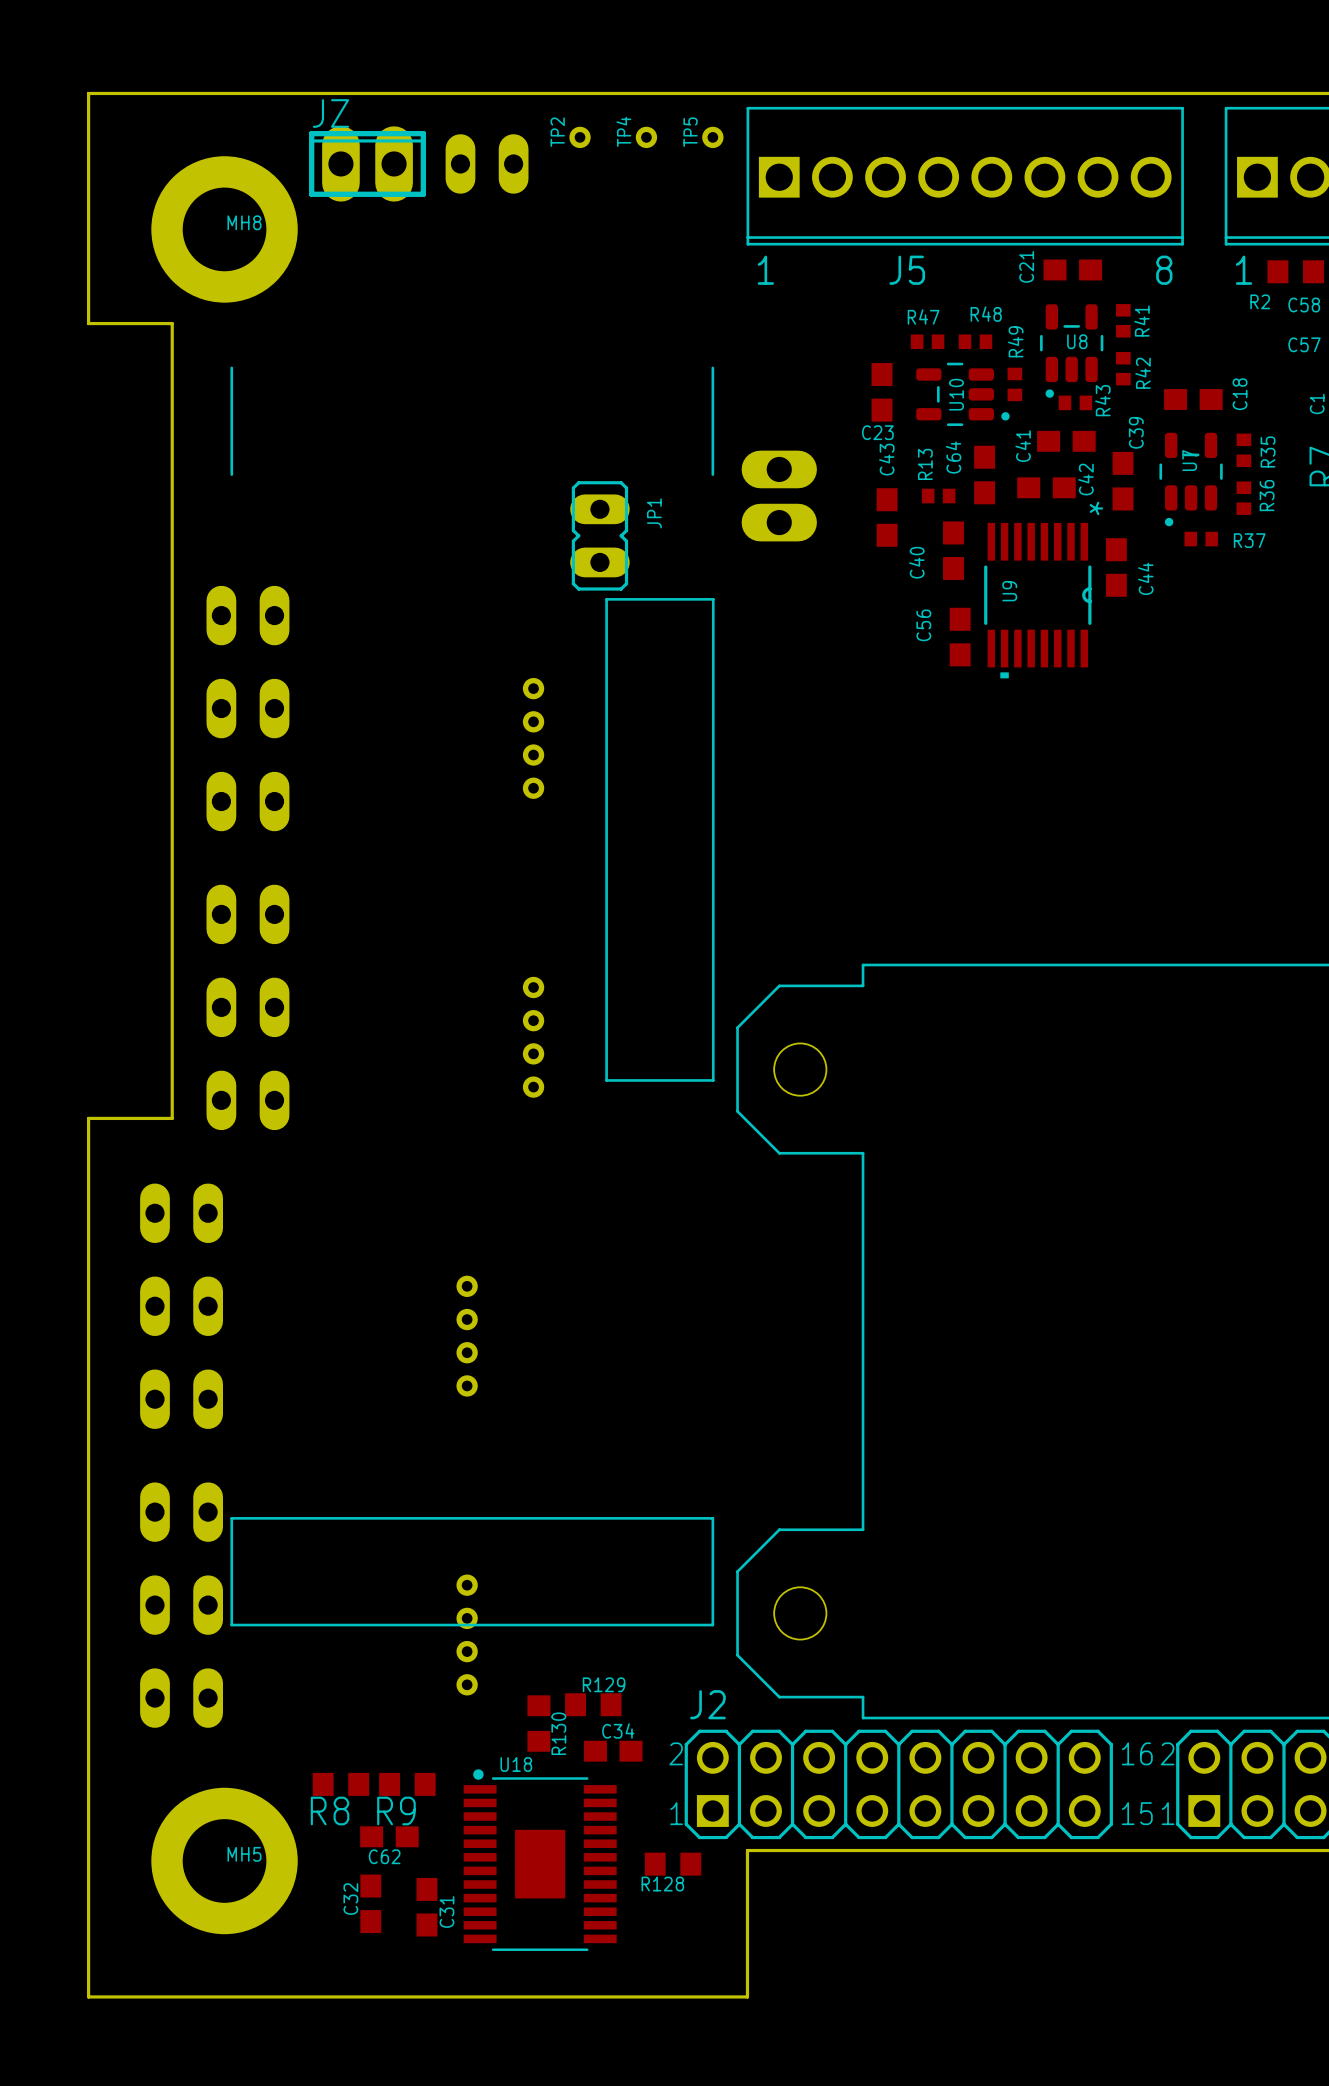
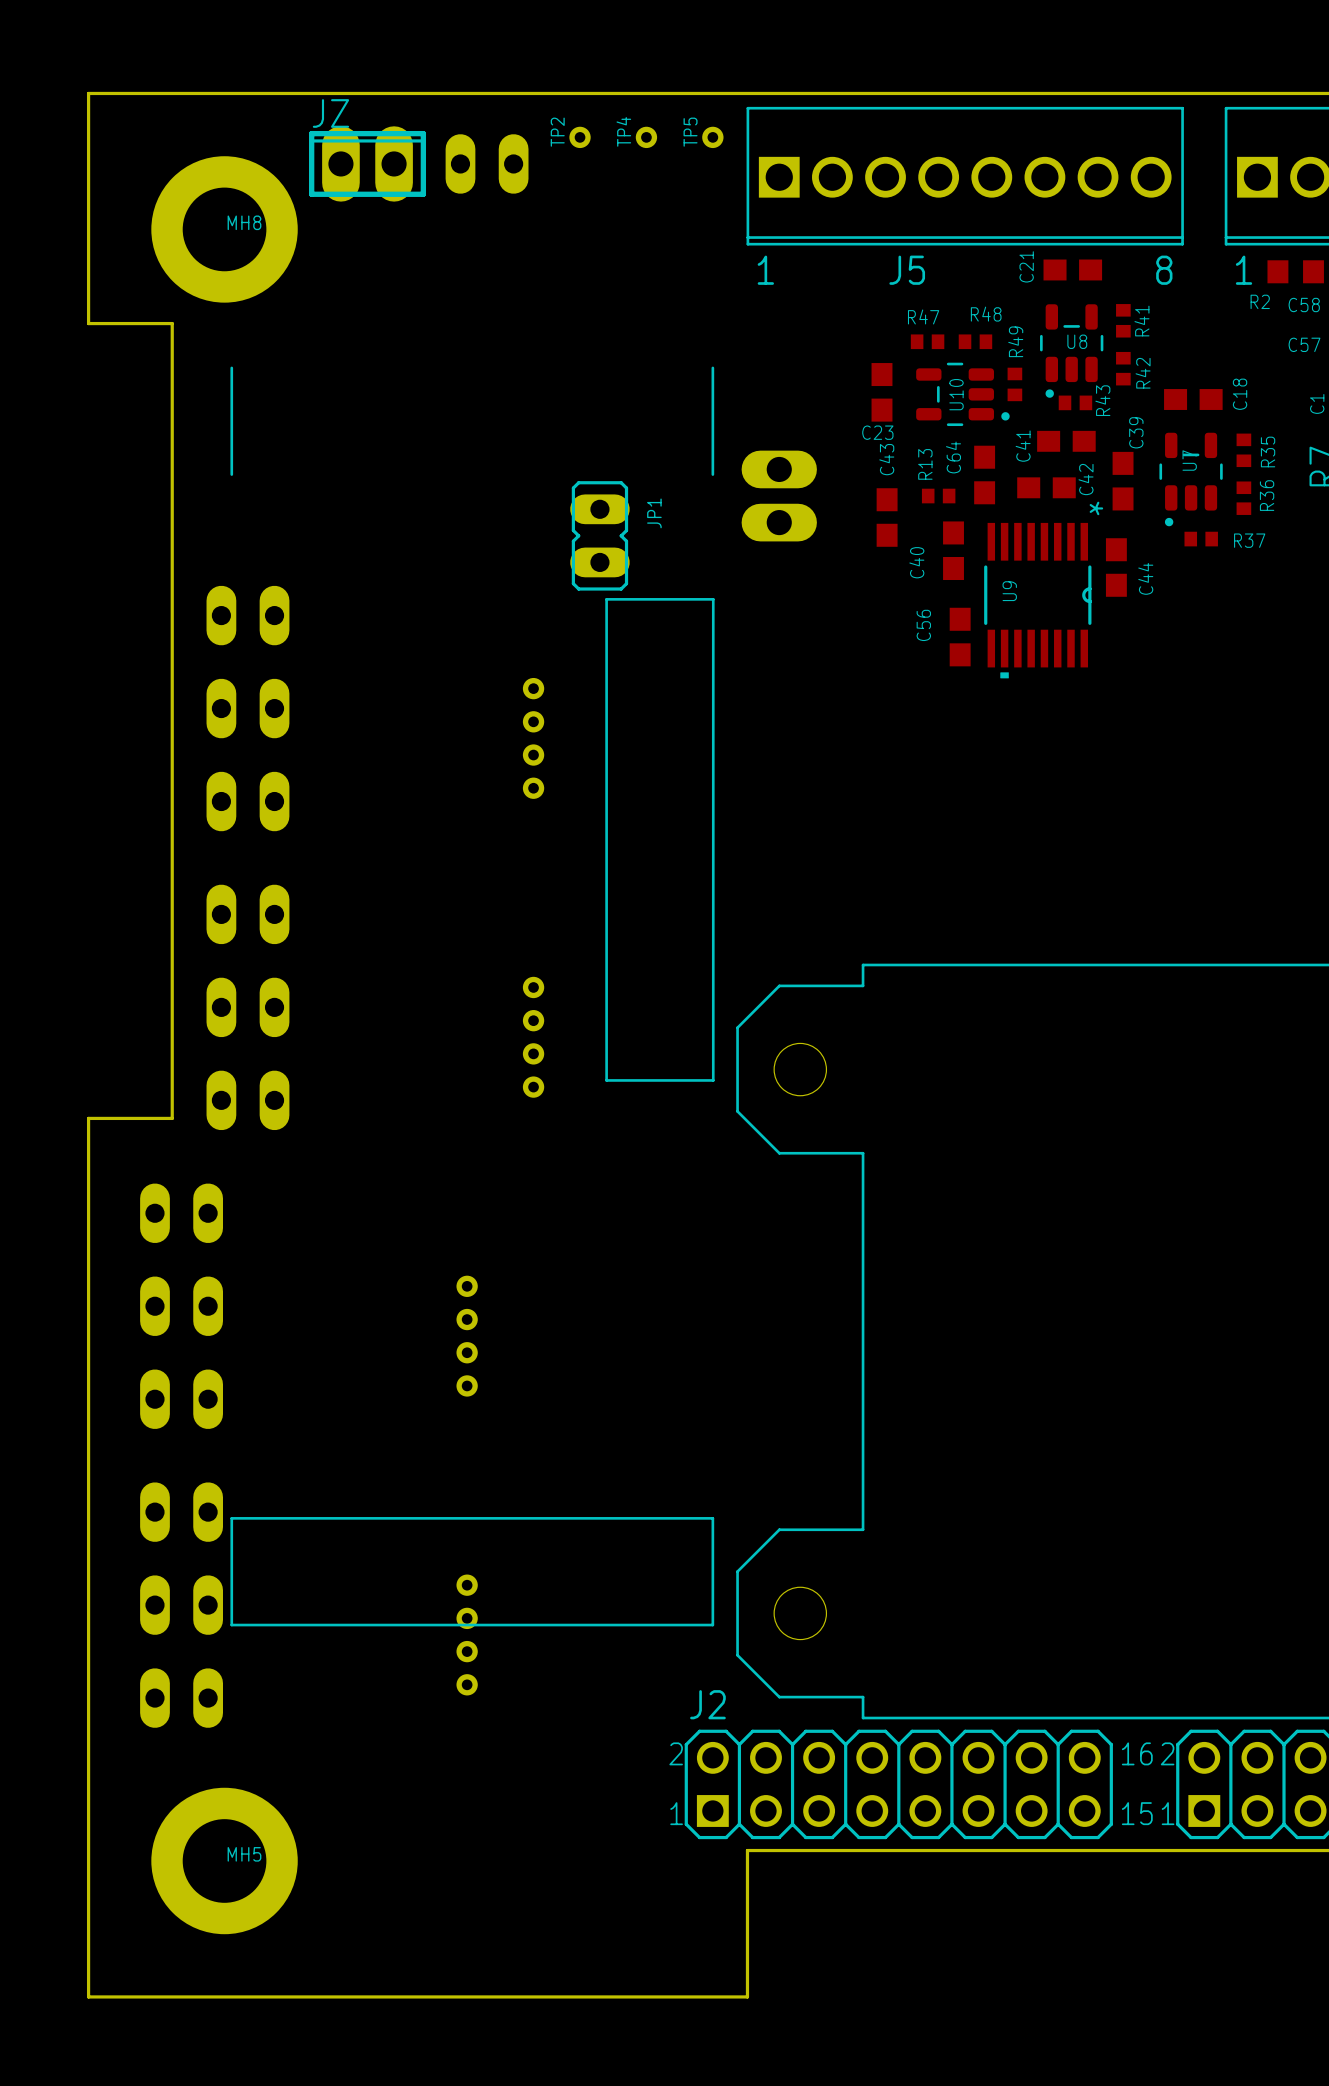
R129: (593, 1704) -> none
R130: (538, 1723) -> none
C34: (613, 1751) -> none
R8: (340, 1784) -> none
R9: (407, 1784) -> none
C62: (389, 1836) -> none
U18: (540, 1860) -> none
R128: (673, 1864) -> none
C32: (370, 1903) -> none
C31: (427, 1907) -> none

